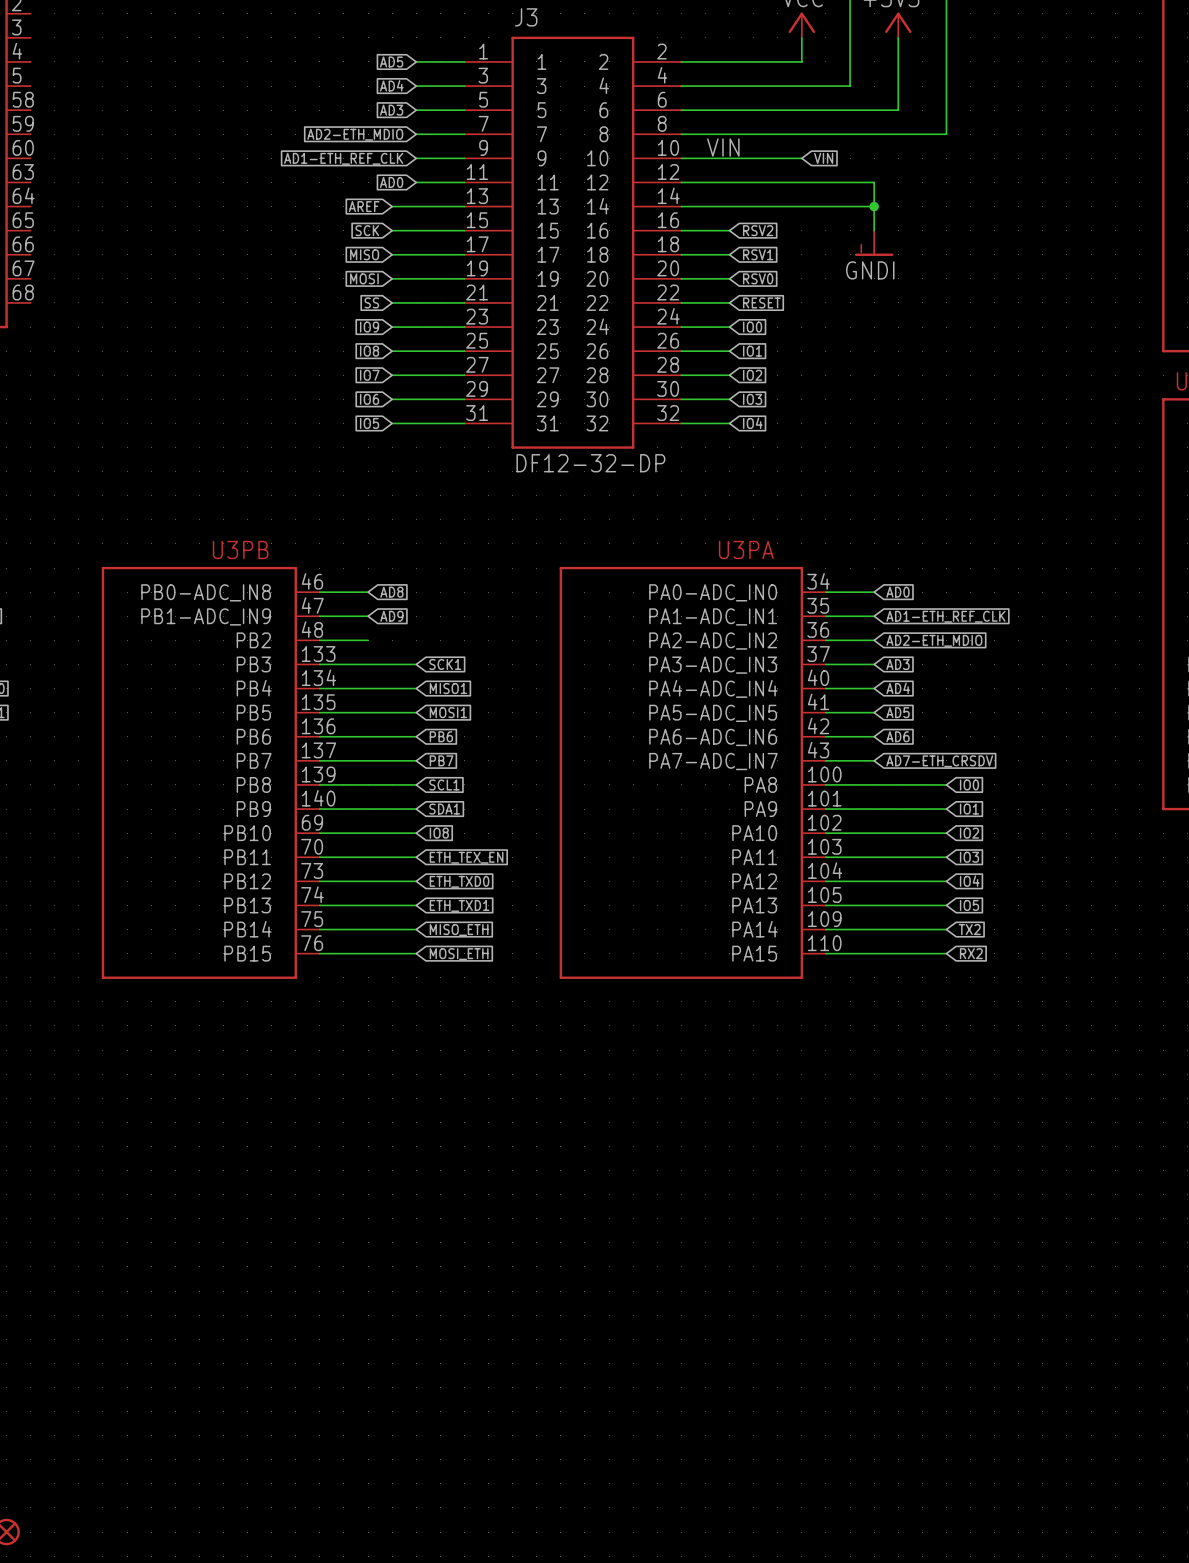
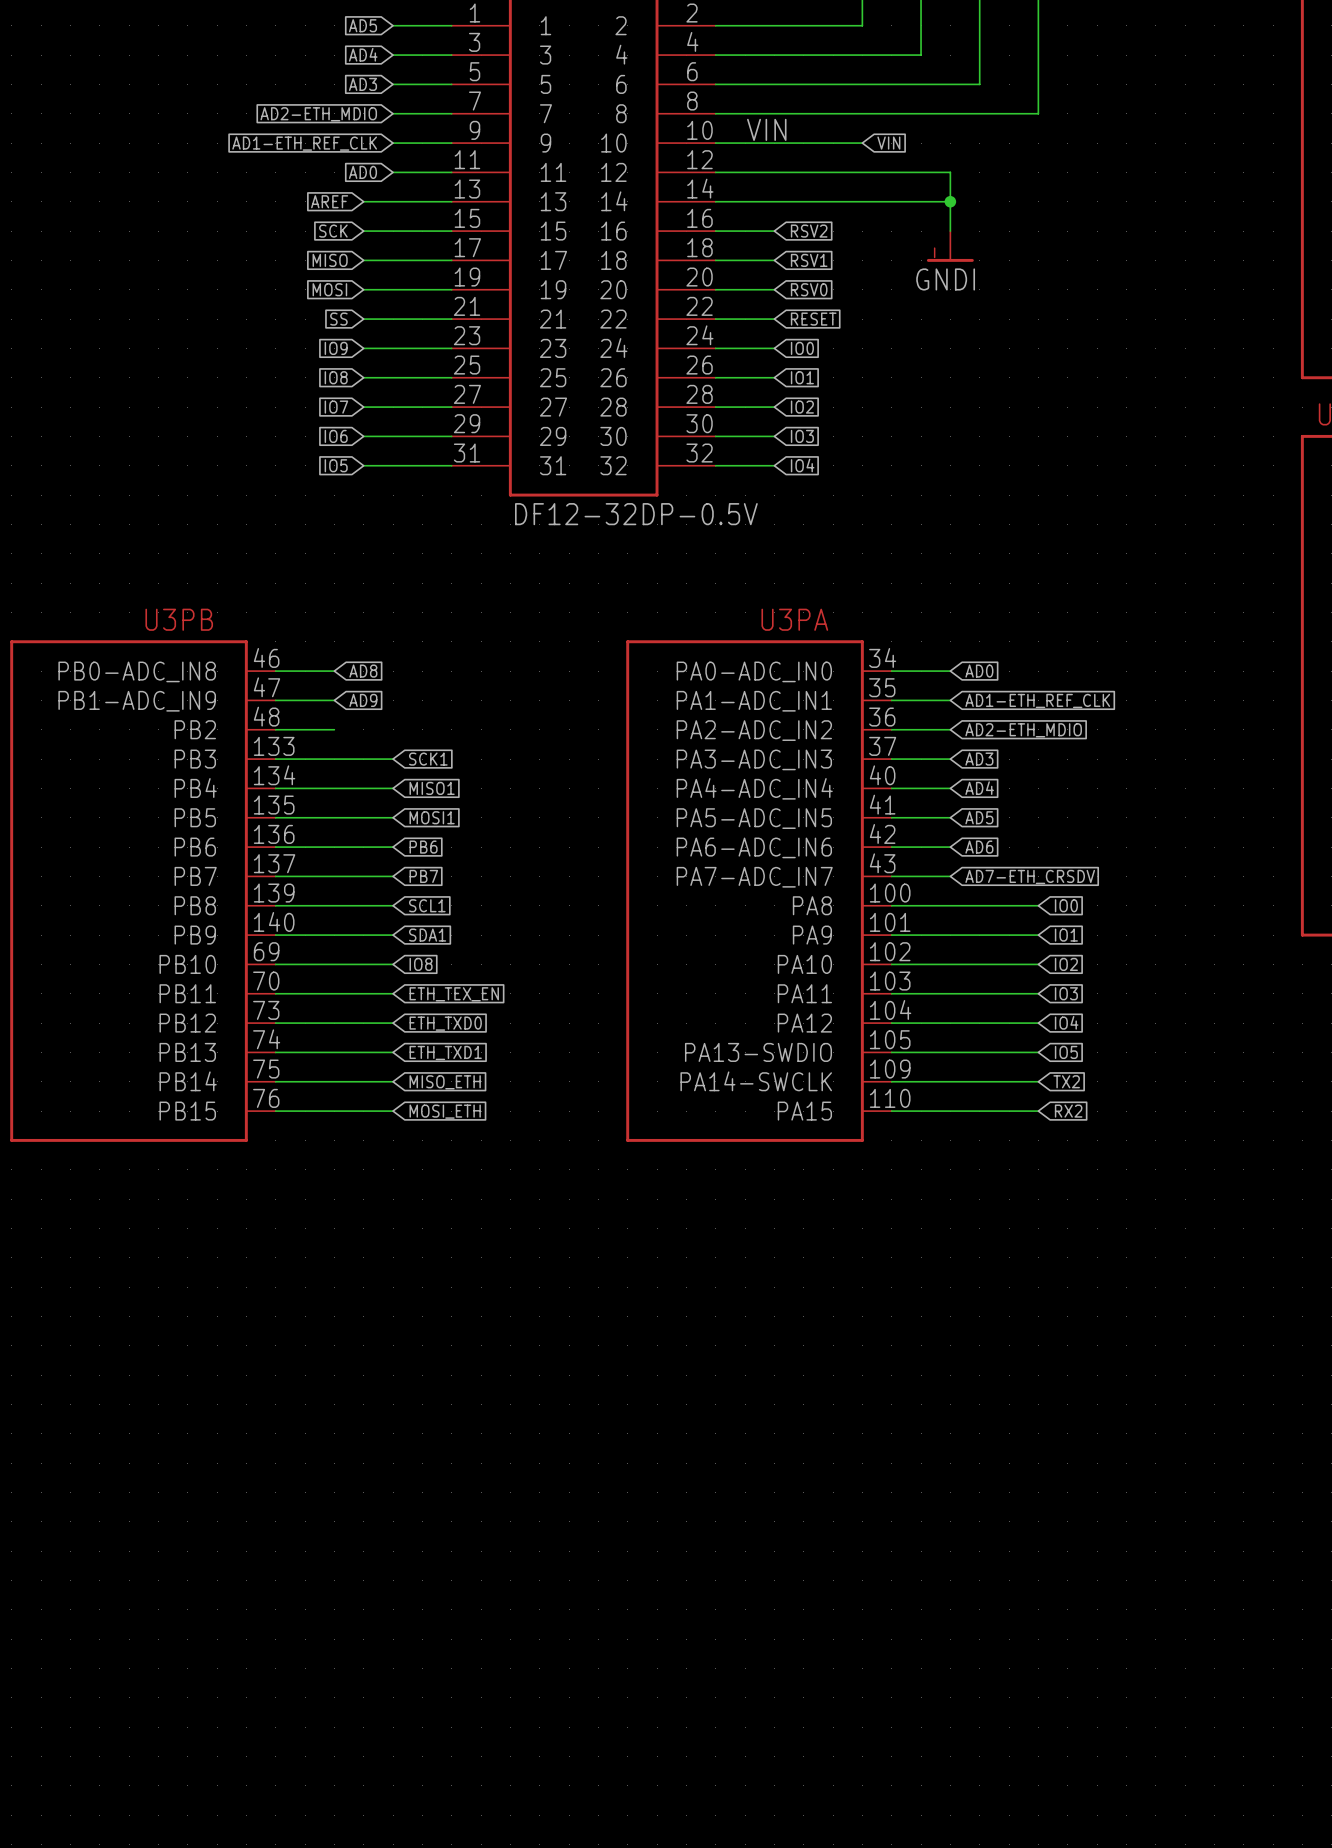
J3 value: DF12-32-DP (590, 463) -> DF12-32DP-0.5V (636, 514)
U3PA symbol: [559, 566, 826, 979] -> [626, 640, 892, 1142]

